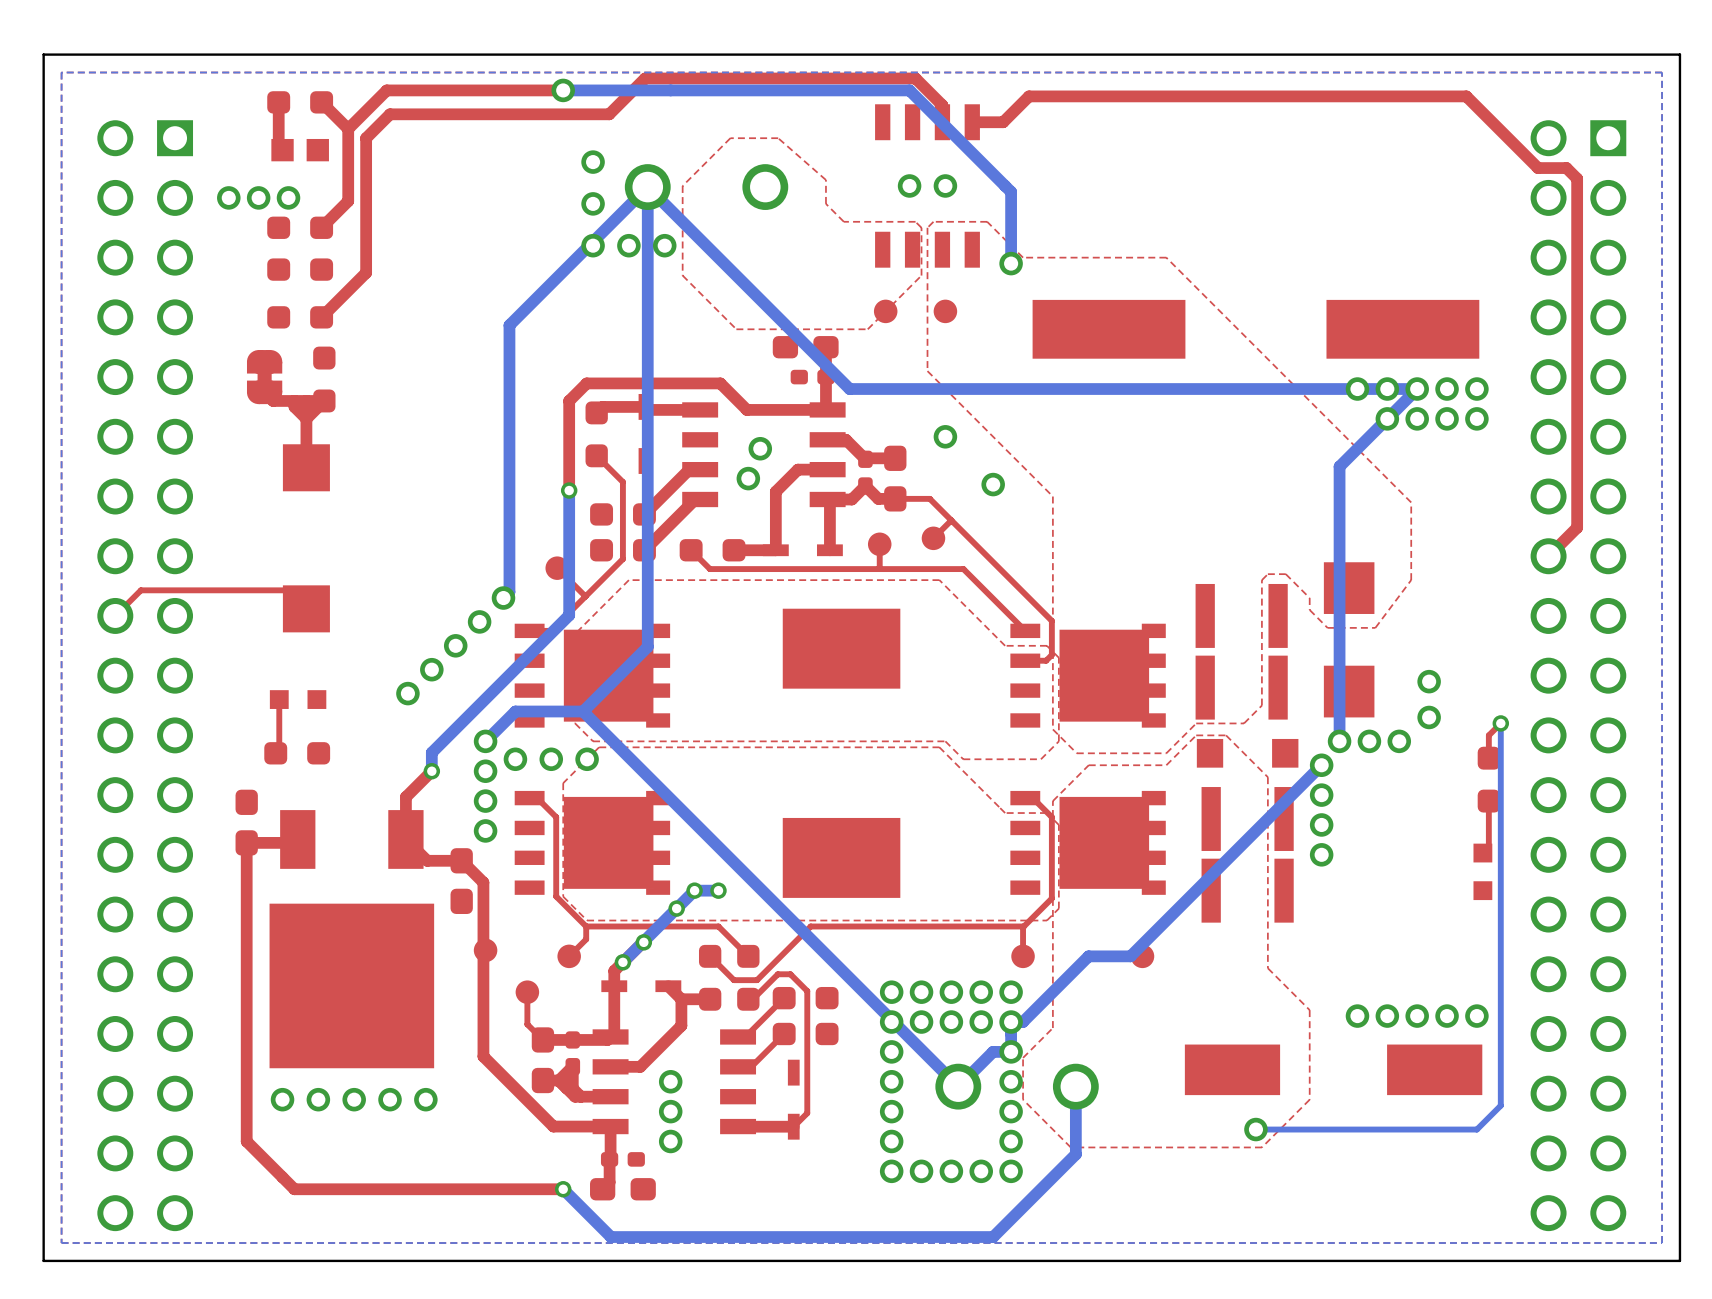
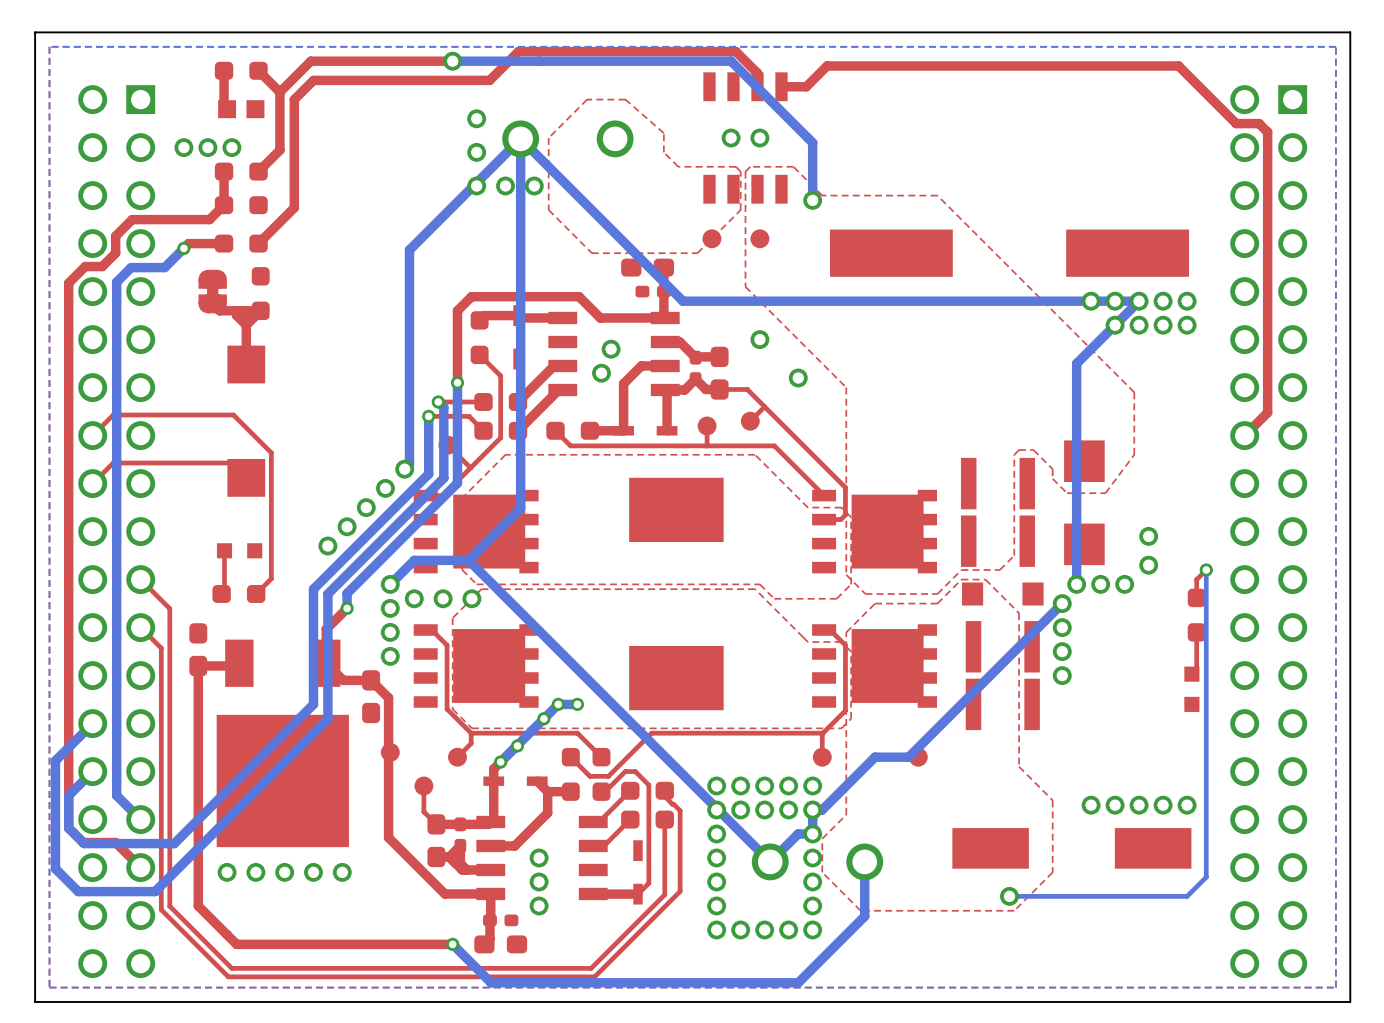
top track: none -> (224, 171) (224, 205) (209, 219) (132, 219) (115, 236) (115, 253) (102, 266) (85, 266) (68, 283) (68, 828) (83, 842) (115, 842) (140, 867)
top track: none -> (224, 243) (188, 243) (183, 248)
bottom track: none -> (183, 248) (164, 267) (131, 267) (116, 282) (116, 795) (140, 819)
via: none -> (183, 248)
bottom track: none -> (438, 401) (443, 407) (443, 478) (327, 593) (327, 718) (155, 891) (78, 891) (55, 868) (55, 760) (92, 723)
via: none -> (438, 401)
top track: none -> (483, 401) (438, 401)
top track: none -> (428, 416) (469, 416) (483, 430)
bottom track: none -> (428, 416) (428, 473) (313, 589) (313, 704) (174, 843) (84, 843) (68, 828) (68, 795) (92, 771)
via: none -> (428, 416)
top track: none -> (92, 435) (113, 414) (233, 414) (271, 452) (271, 578) (256, 593)
top track: none -> (140, 579) (169, 608) (169, 906) (231, 968) (591, 968) (664, 894) (664, 819)
top track: none -> (140, 627) (161, 648) (161, 909) (228, 976) (594, 976) (680, 891) (680, 810) (664, 796) (664, 790)

